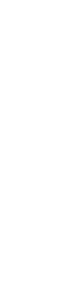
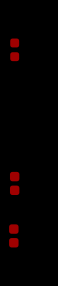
part: none -> (14, 49)
part: none -> (14, 183)
part: none -> (13, 235)

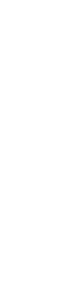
part: (14, 49) -> none
part: (14, 183) -> none
part: (13, 235) -> none

